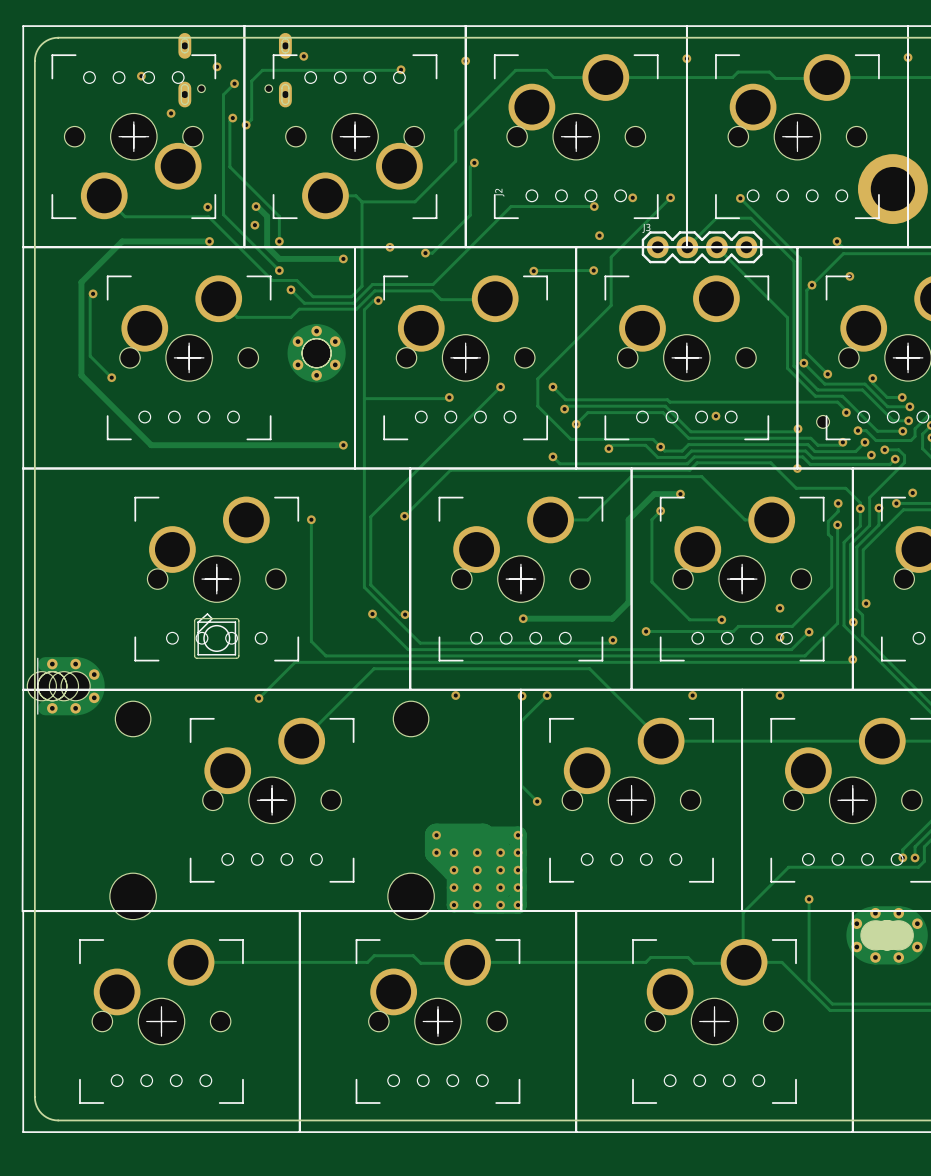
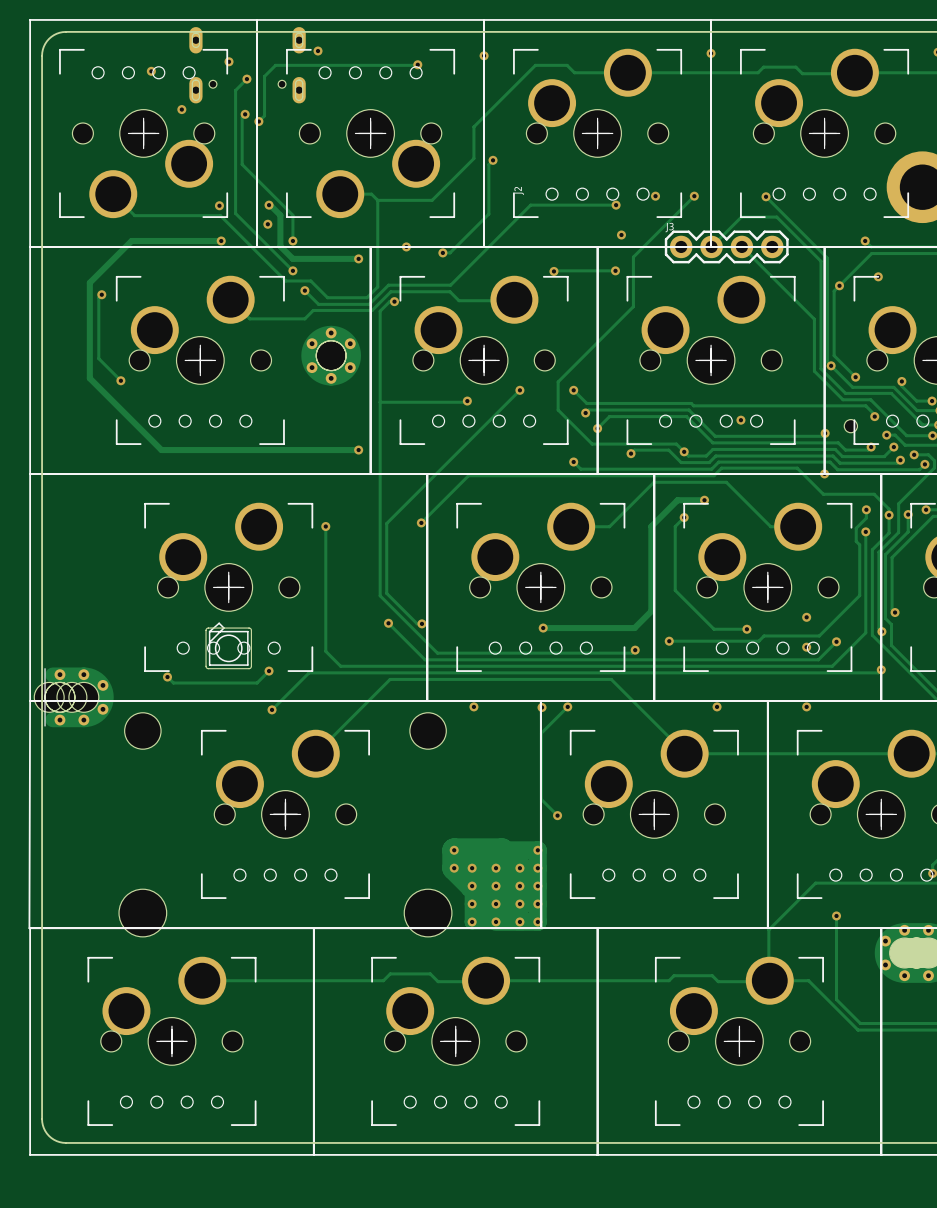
track: none -> (269, 671) (257, 683) (173, 683) (167, 677)
via: none -> (269, 671)
via: none -> (167, 677)

